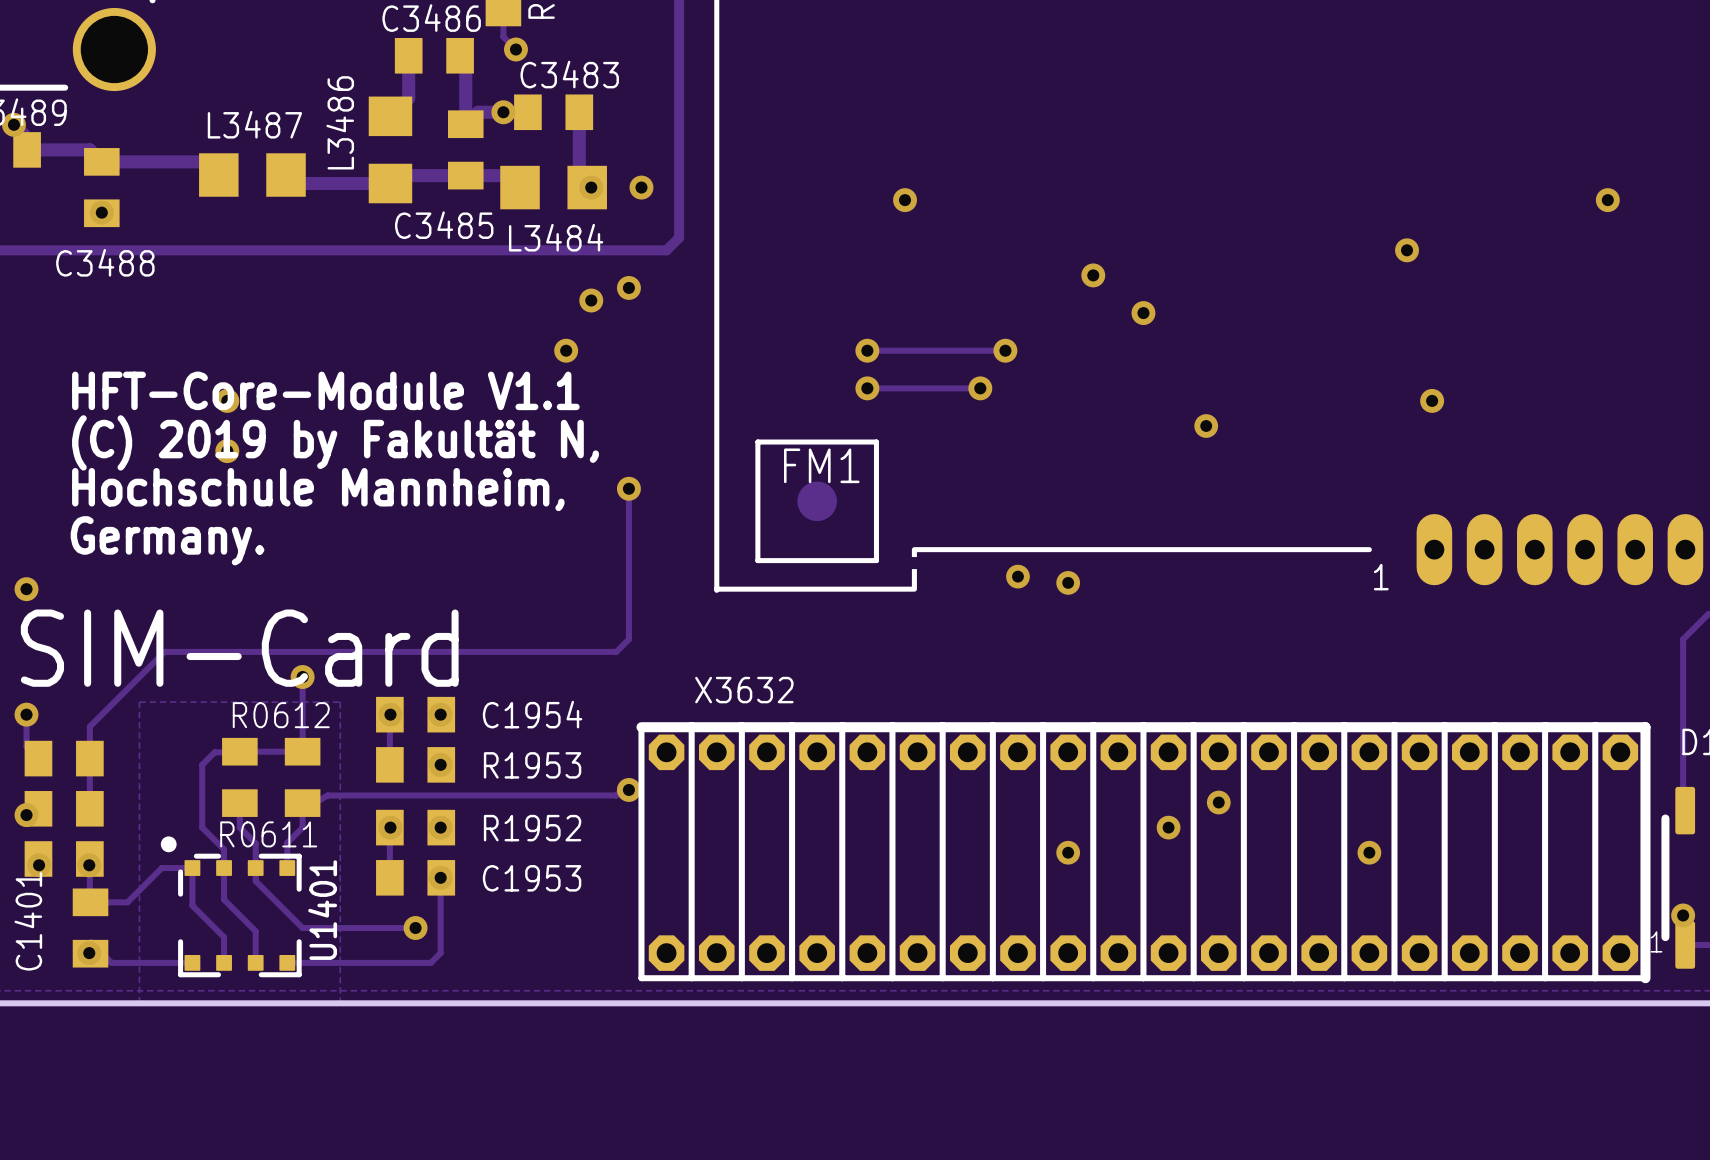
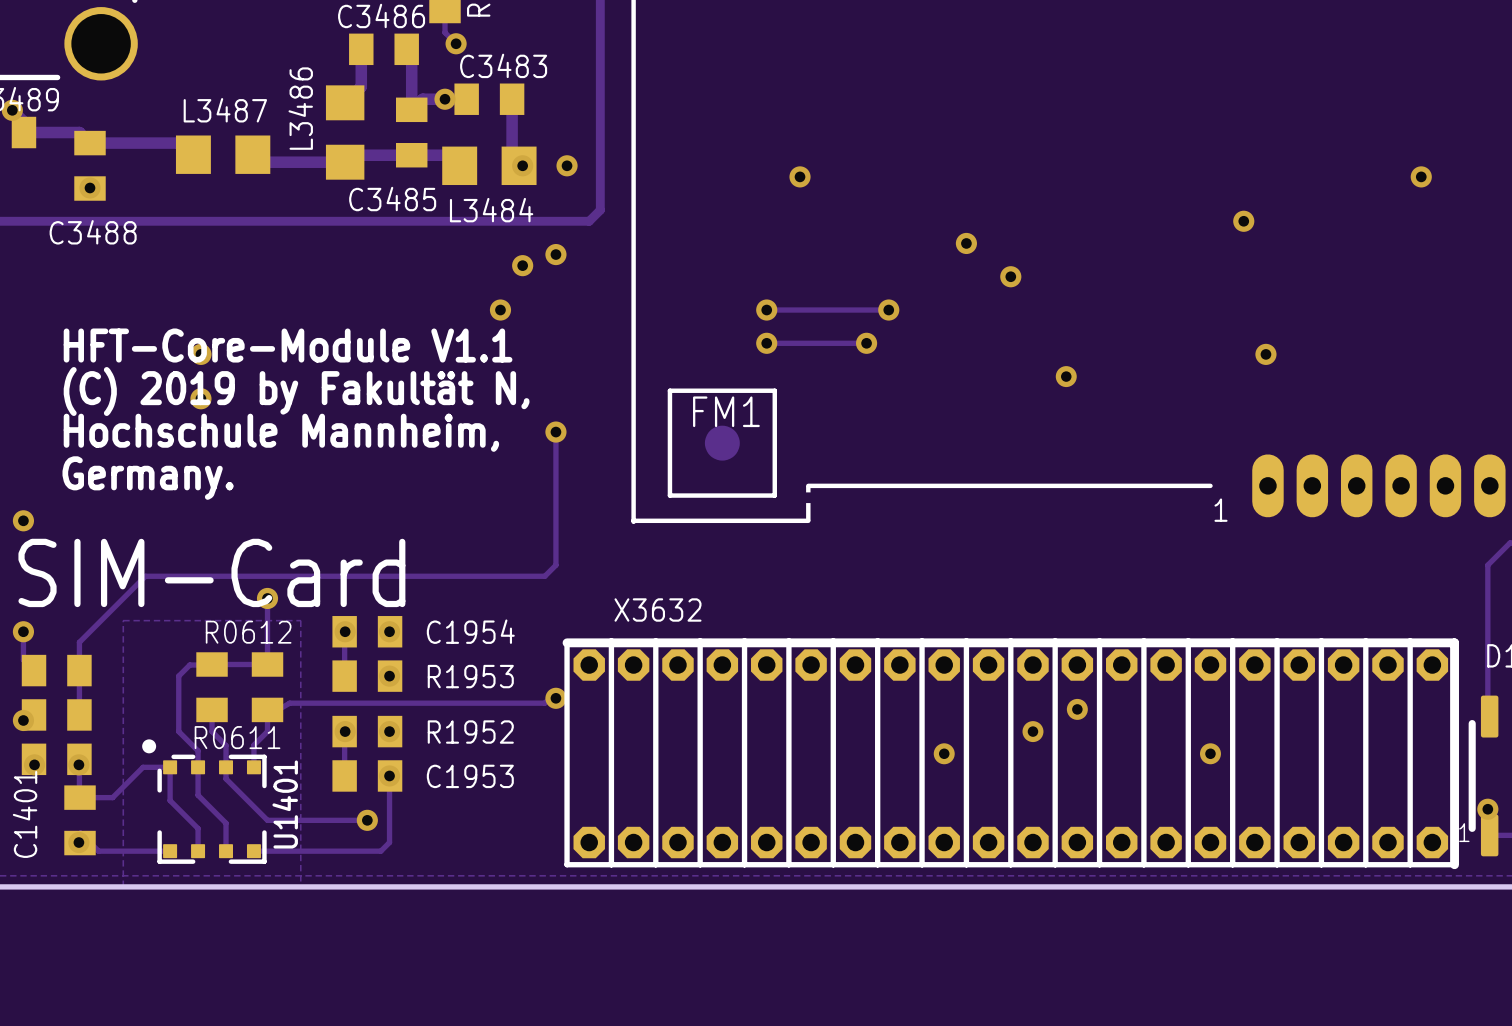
via: (1017, 576) -> none
via: (1068, 582) -> none

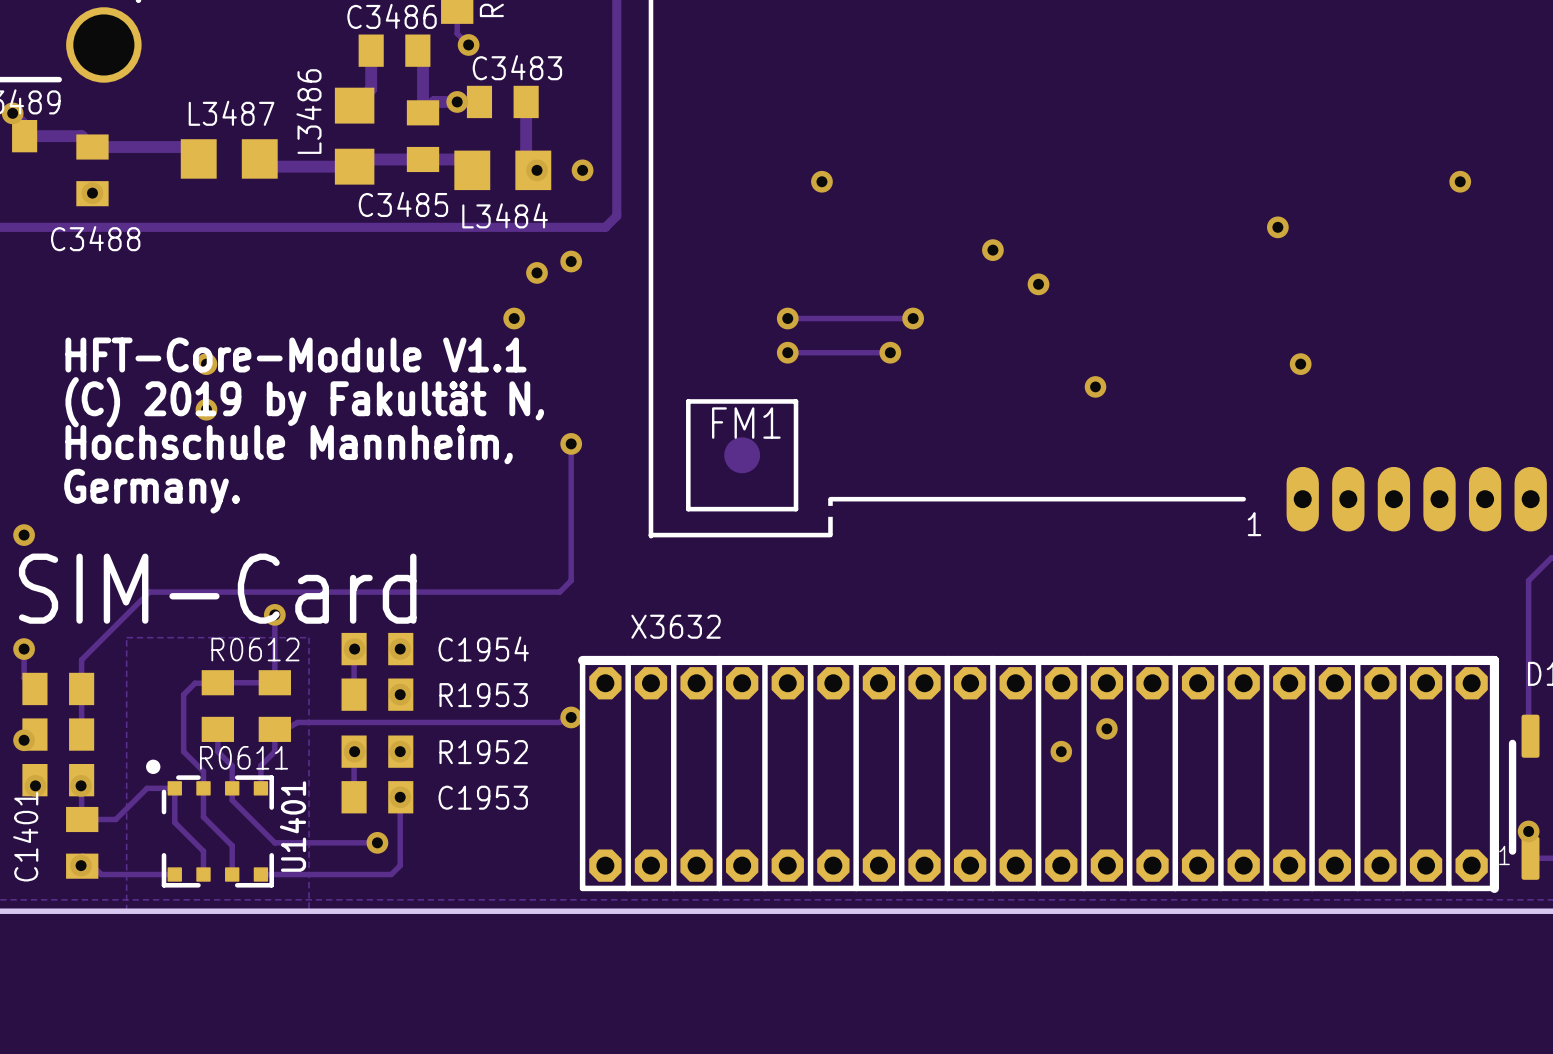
via: (944, 753) -> none
via: (1210, 753) -> none

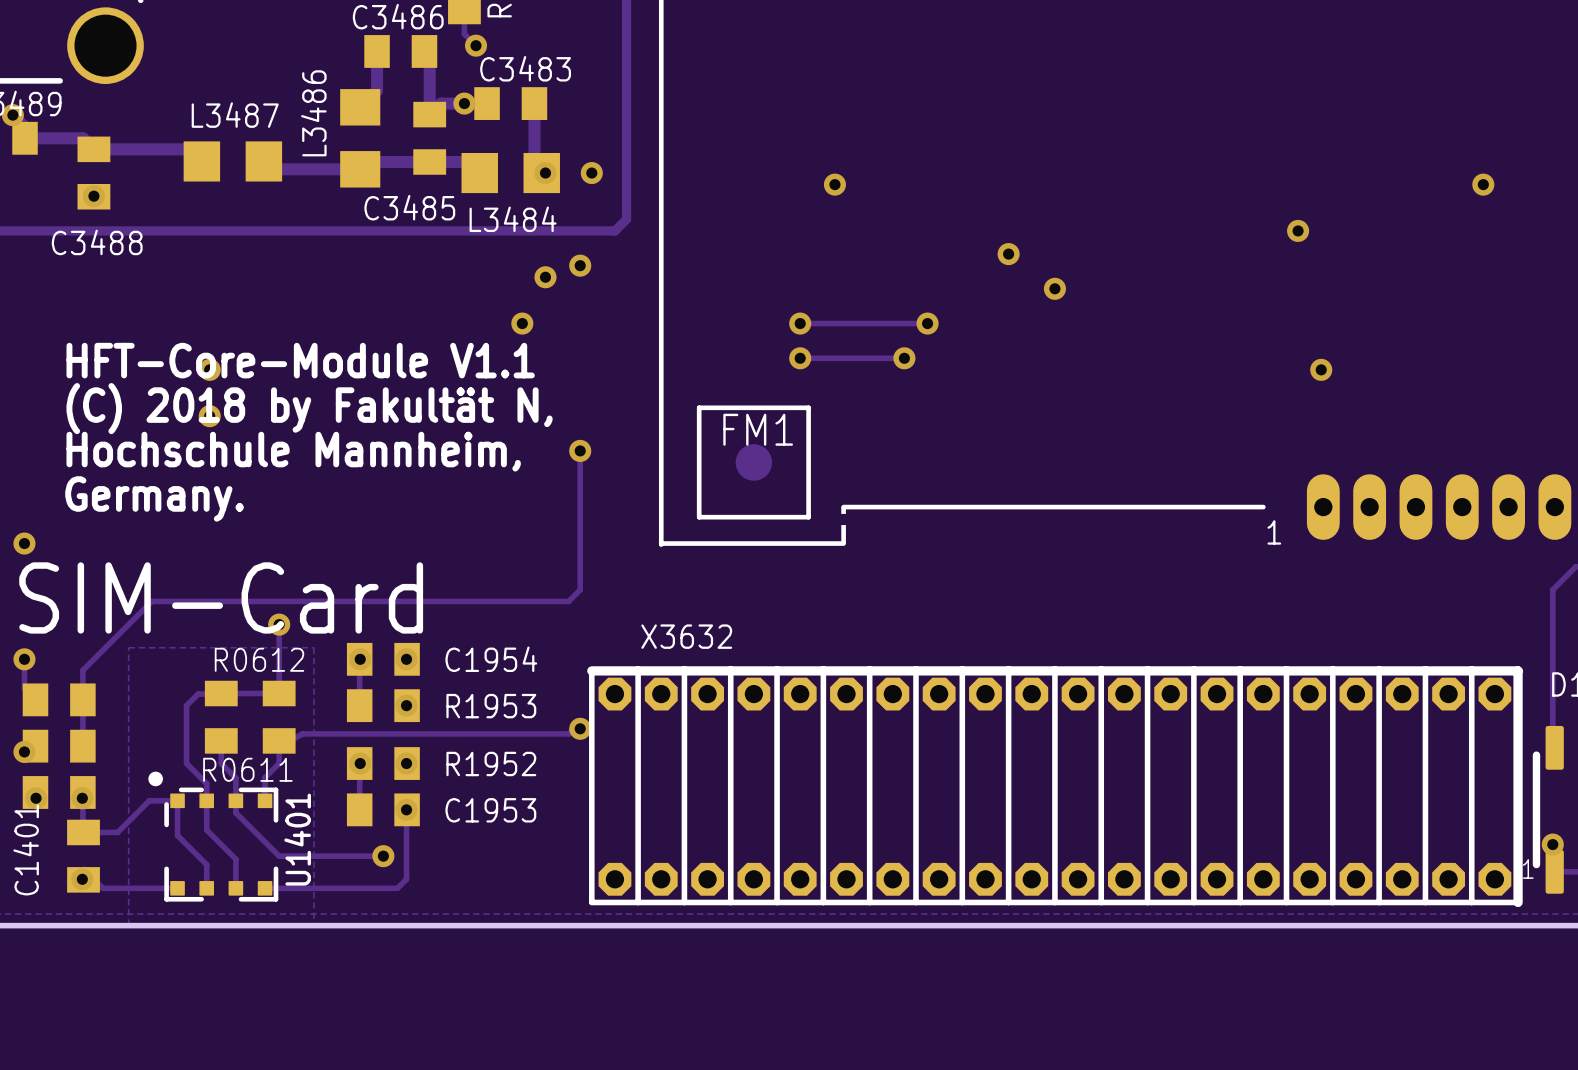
via: (1095, 386) -> none
text: (C) 2019 by Fakultät N, (304, 402) -> (C) 2018 by Fakultät N, (309, 408)
via: (1106, 728) -> none
via: (1061, 751) -> none

